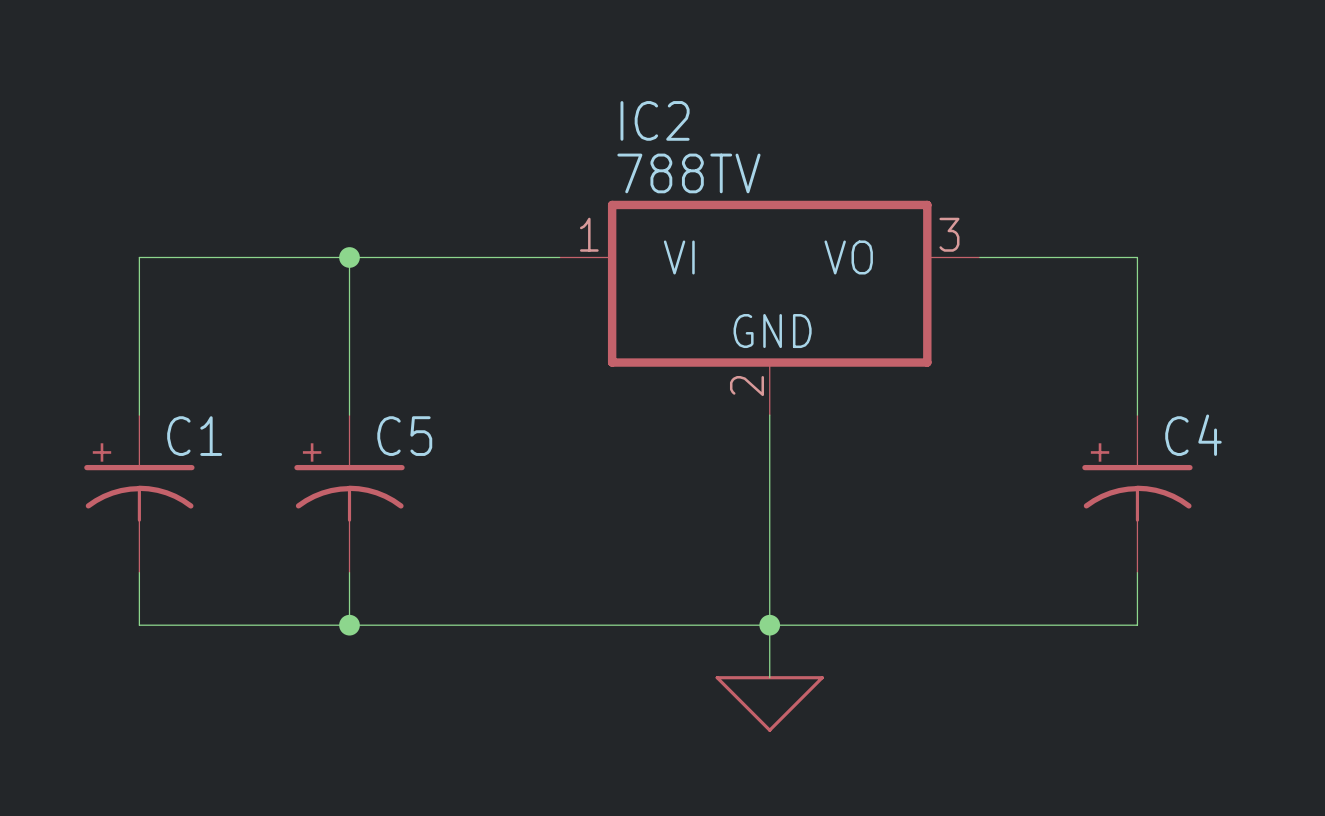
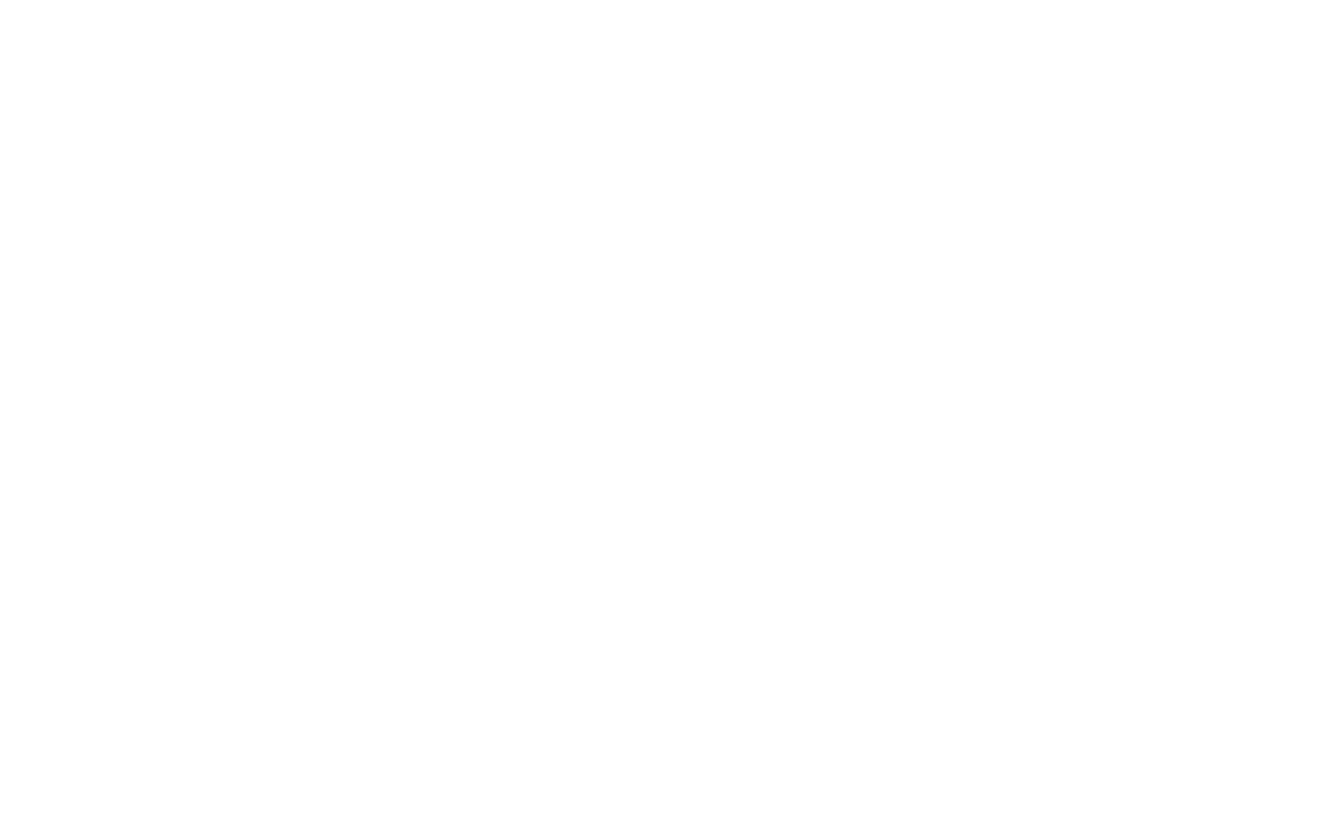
wire: (349, 257) (349, 415) -> none
junction: (349, 257) -> none
wire: (559, 257) (139, 257) (139, 415) -> none
wire: (979, 257) (1137, 257) (1137, 415) -> none
IC2: 788TV (769, 307) -> none
wire: (769, 415) (769, 677) -> none
C1: (139, 493) -> none
C5: (349, 493) -> none
C4: (1137, 493) -> none
wire: (139, 572) (139, 625) (1137, 625) (1137, 572) -> none
wire: (349, 572) (349, 625) -> none
junction: (349, 625) -> none
junction: (769, 625) -> none
power symbol: (769, 703) -> none

